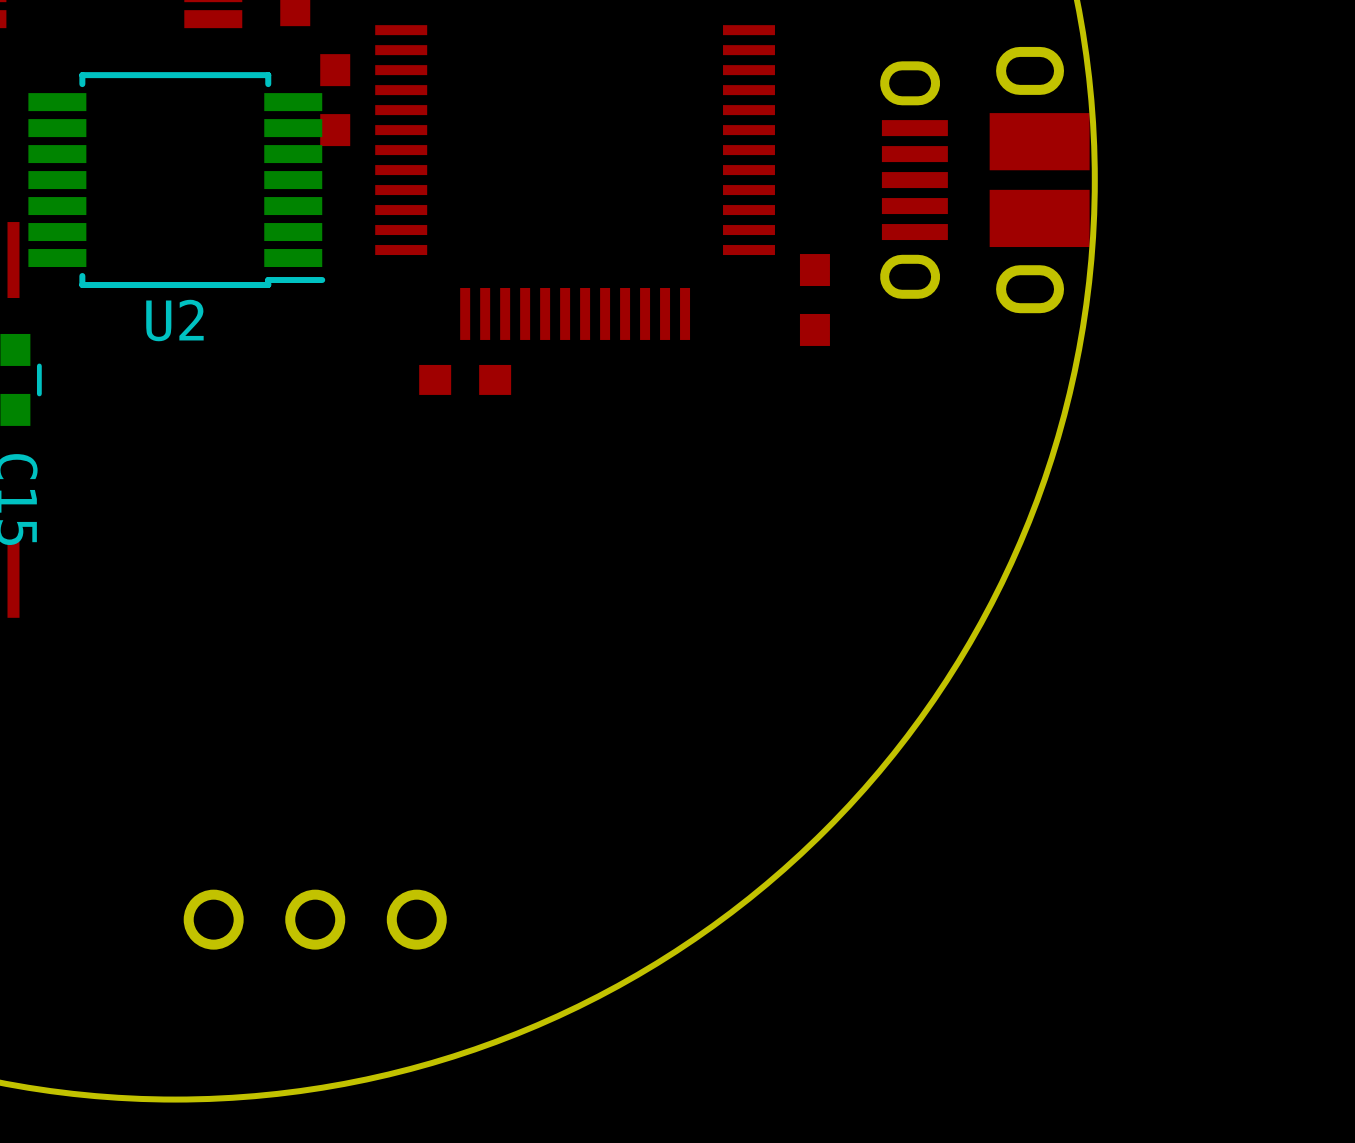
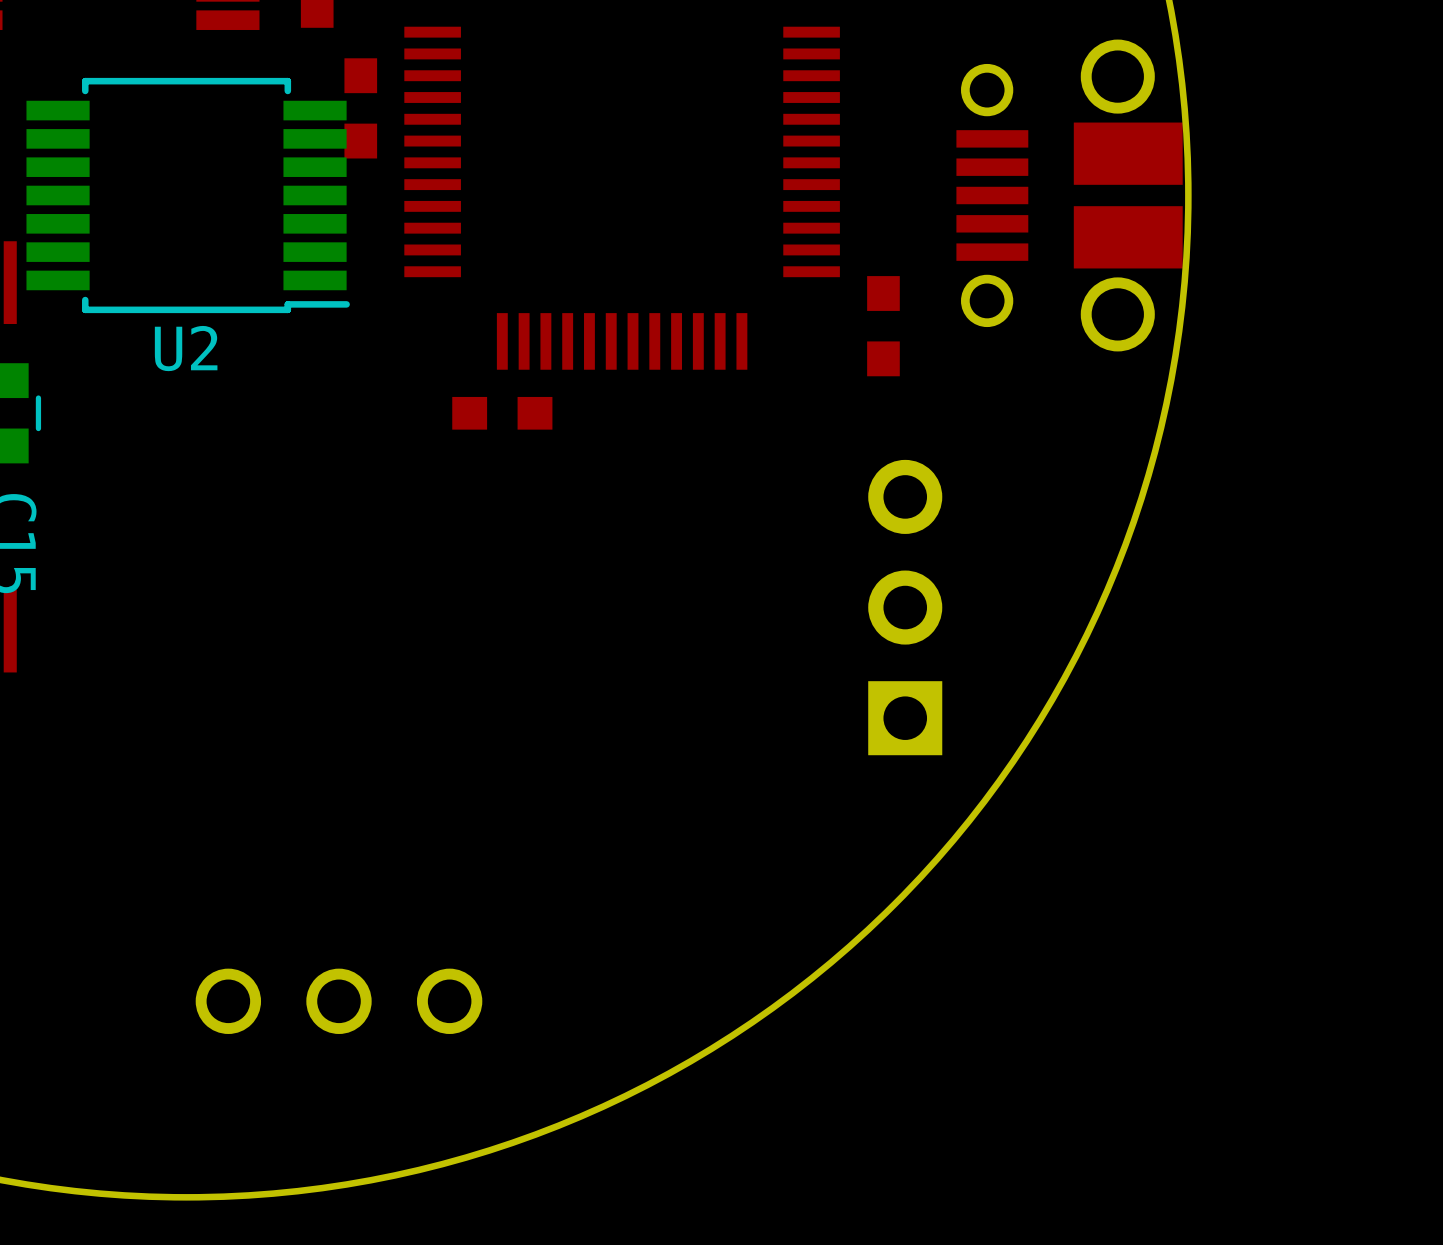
part footprint: [880, 46, 1090, 314] -> [956, 39, 1183, 352]
part: none -> (905, 607)

